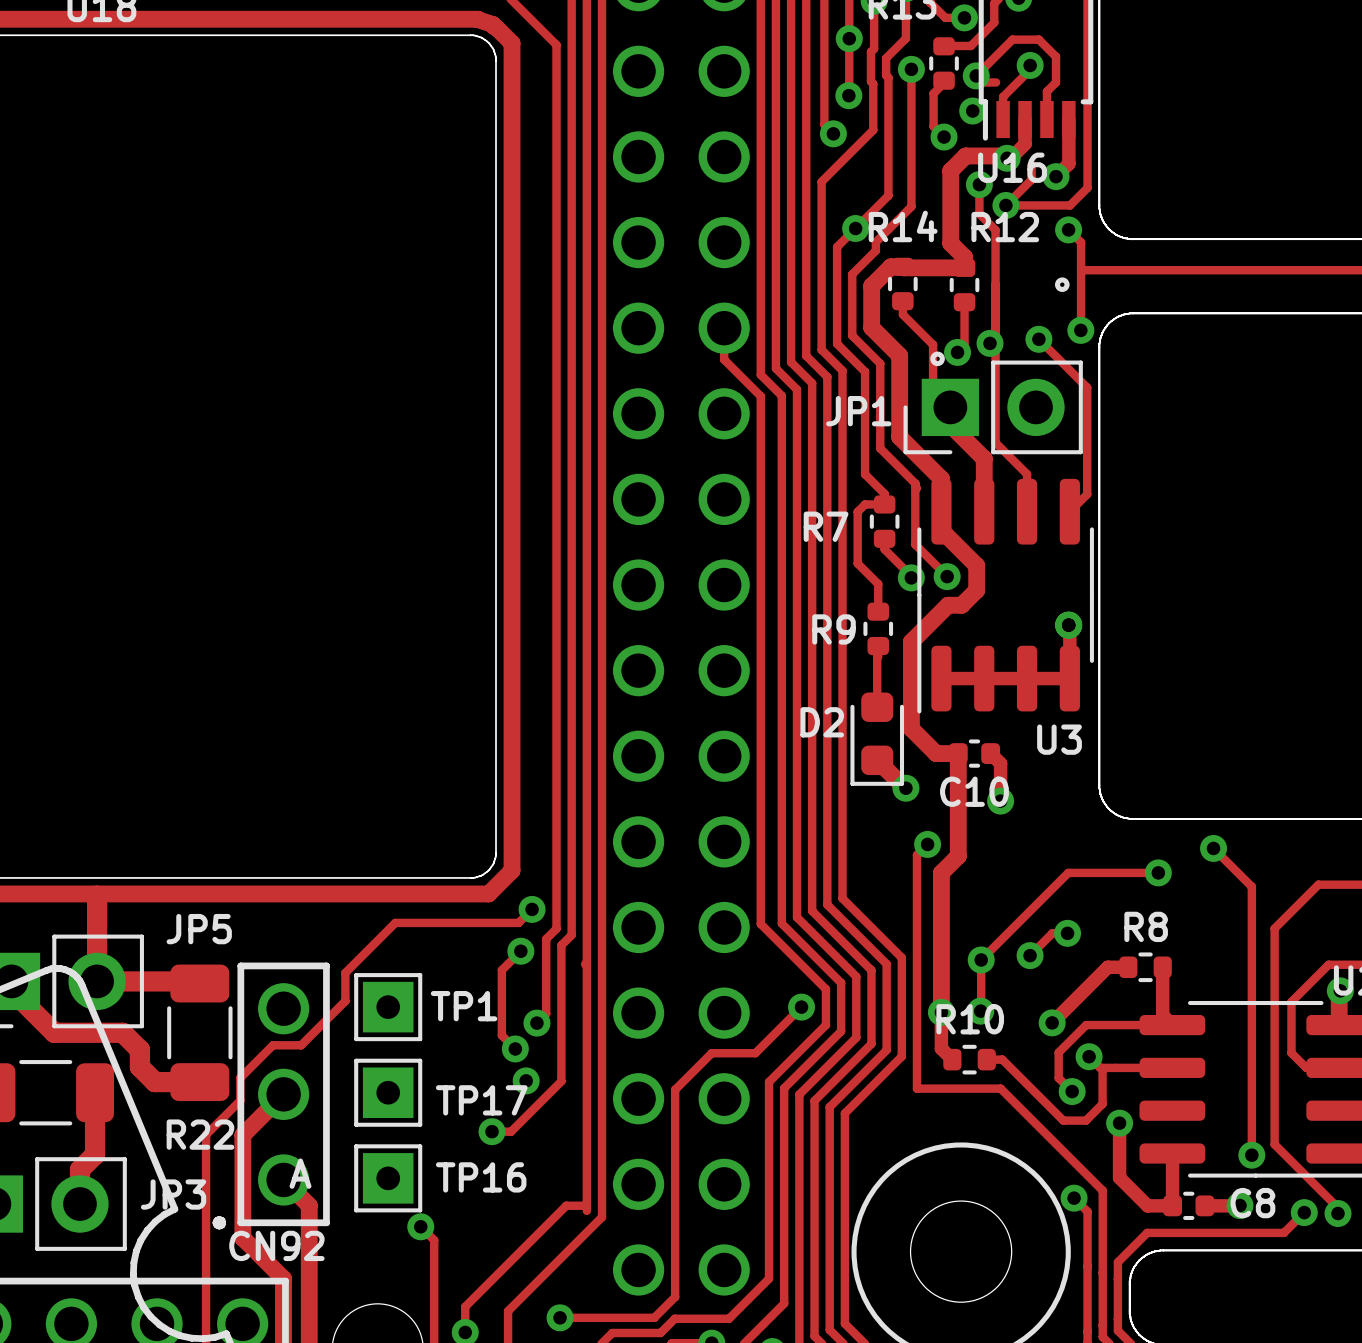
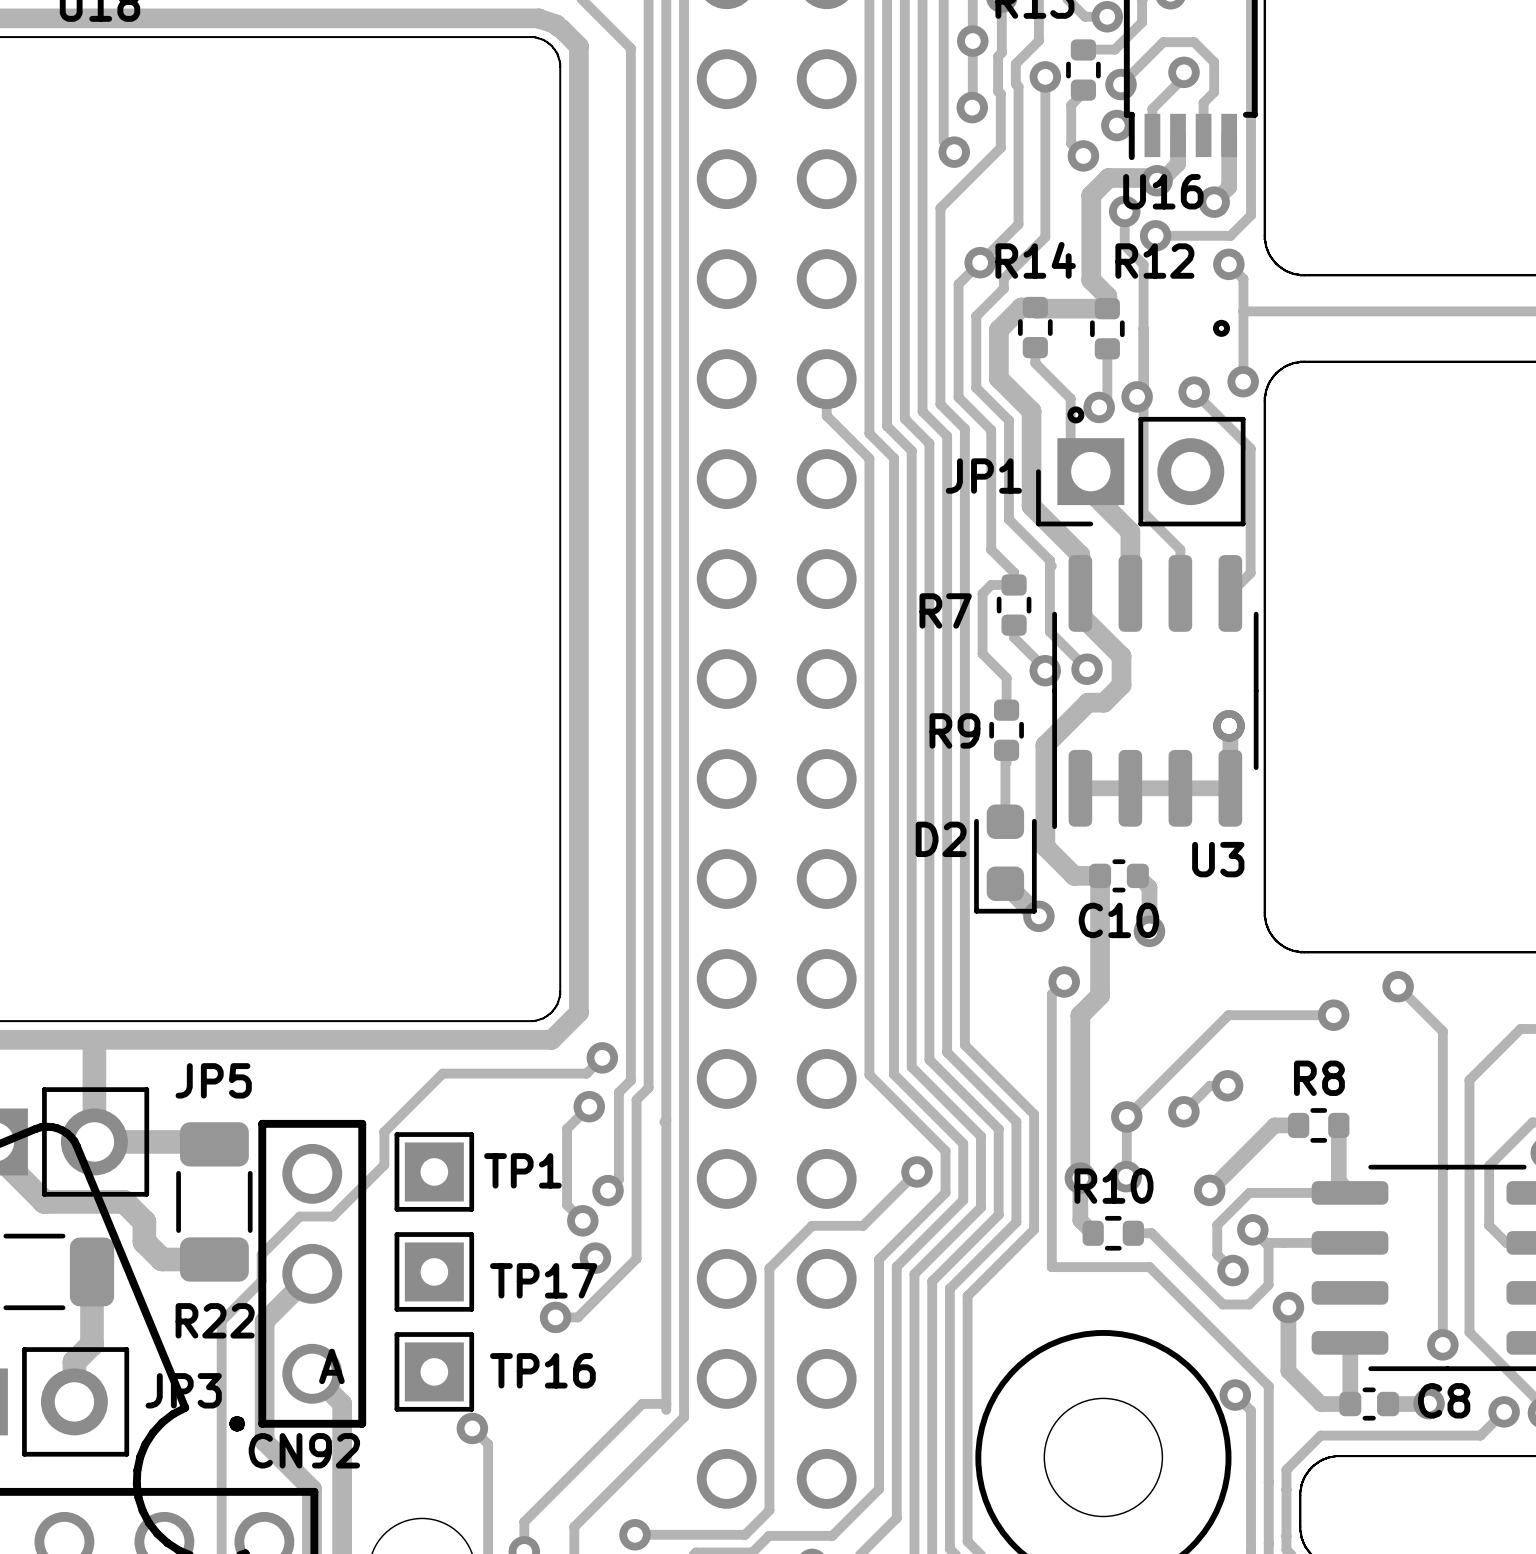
track: (976, 75) (982, 82) (996, 82) -> none
track: (1031, 164) (1031, 179) (1005, 205) -> none

